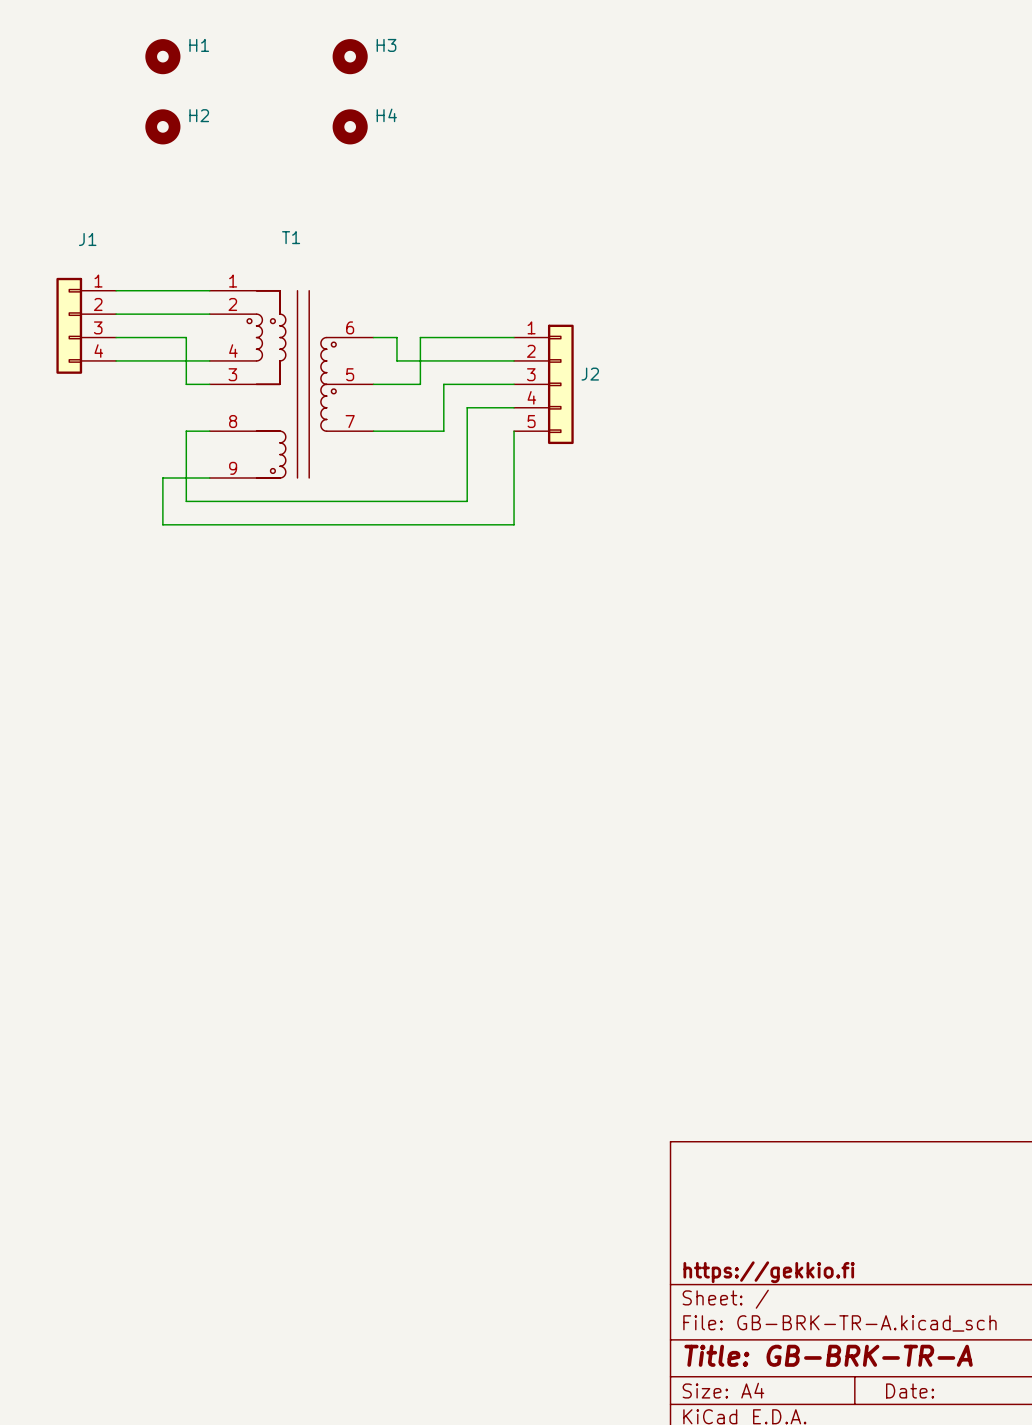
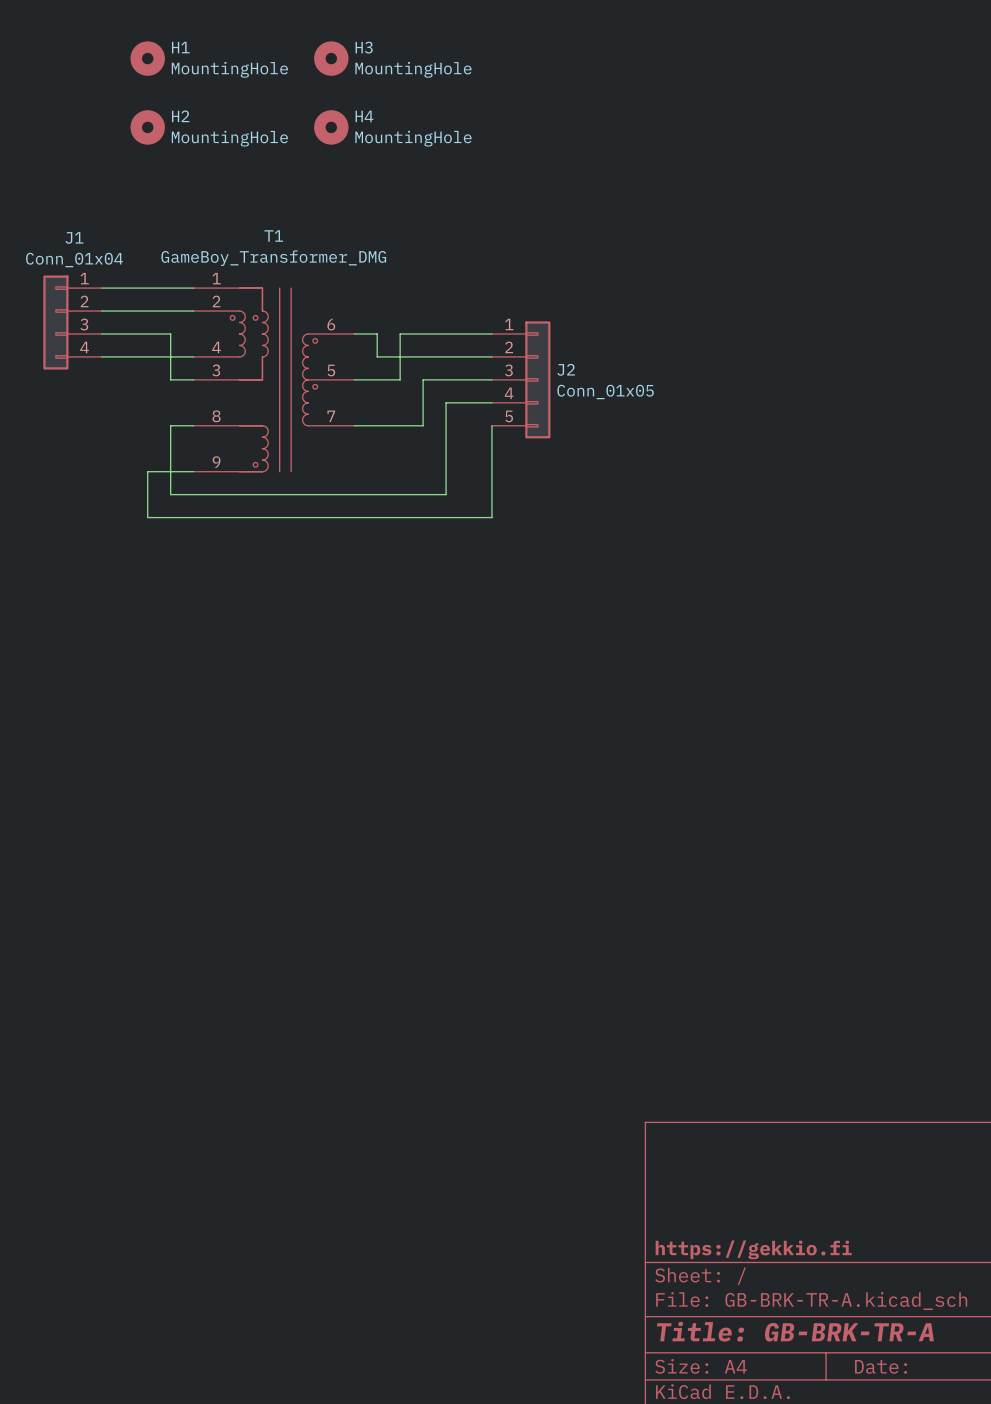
H1 value: none -> MountingHole (229, 69)
H3 value: none -> MountingHole (413, 69)
H2 value: none -> MountingHole (229, 138)
H4 value: none -> MountingHole (413, 138)
T1 value: none -> GameBoy_Transformer_DMG (273, 258)
J1 value: none -> Conn_01x04 (74, 260)
J2 value: none -> Conn_01x05 (605, 391)

